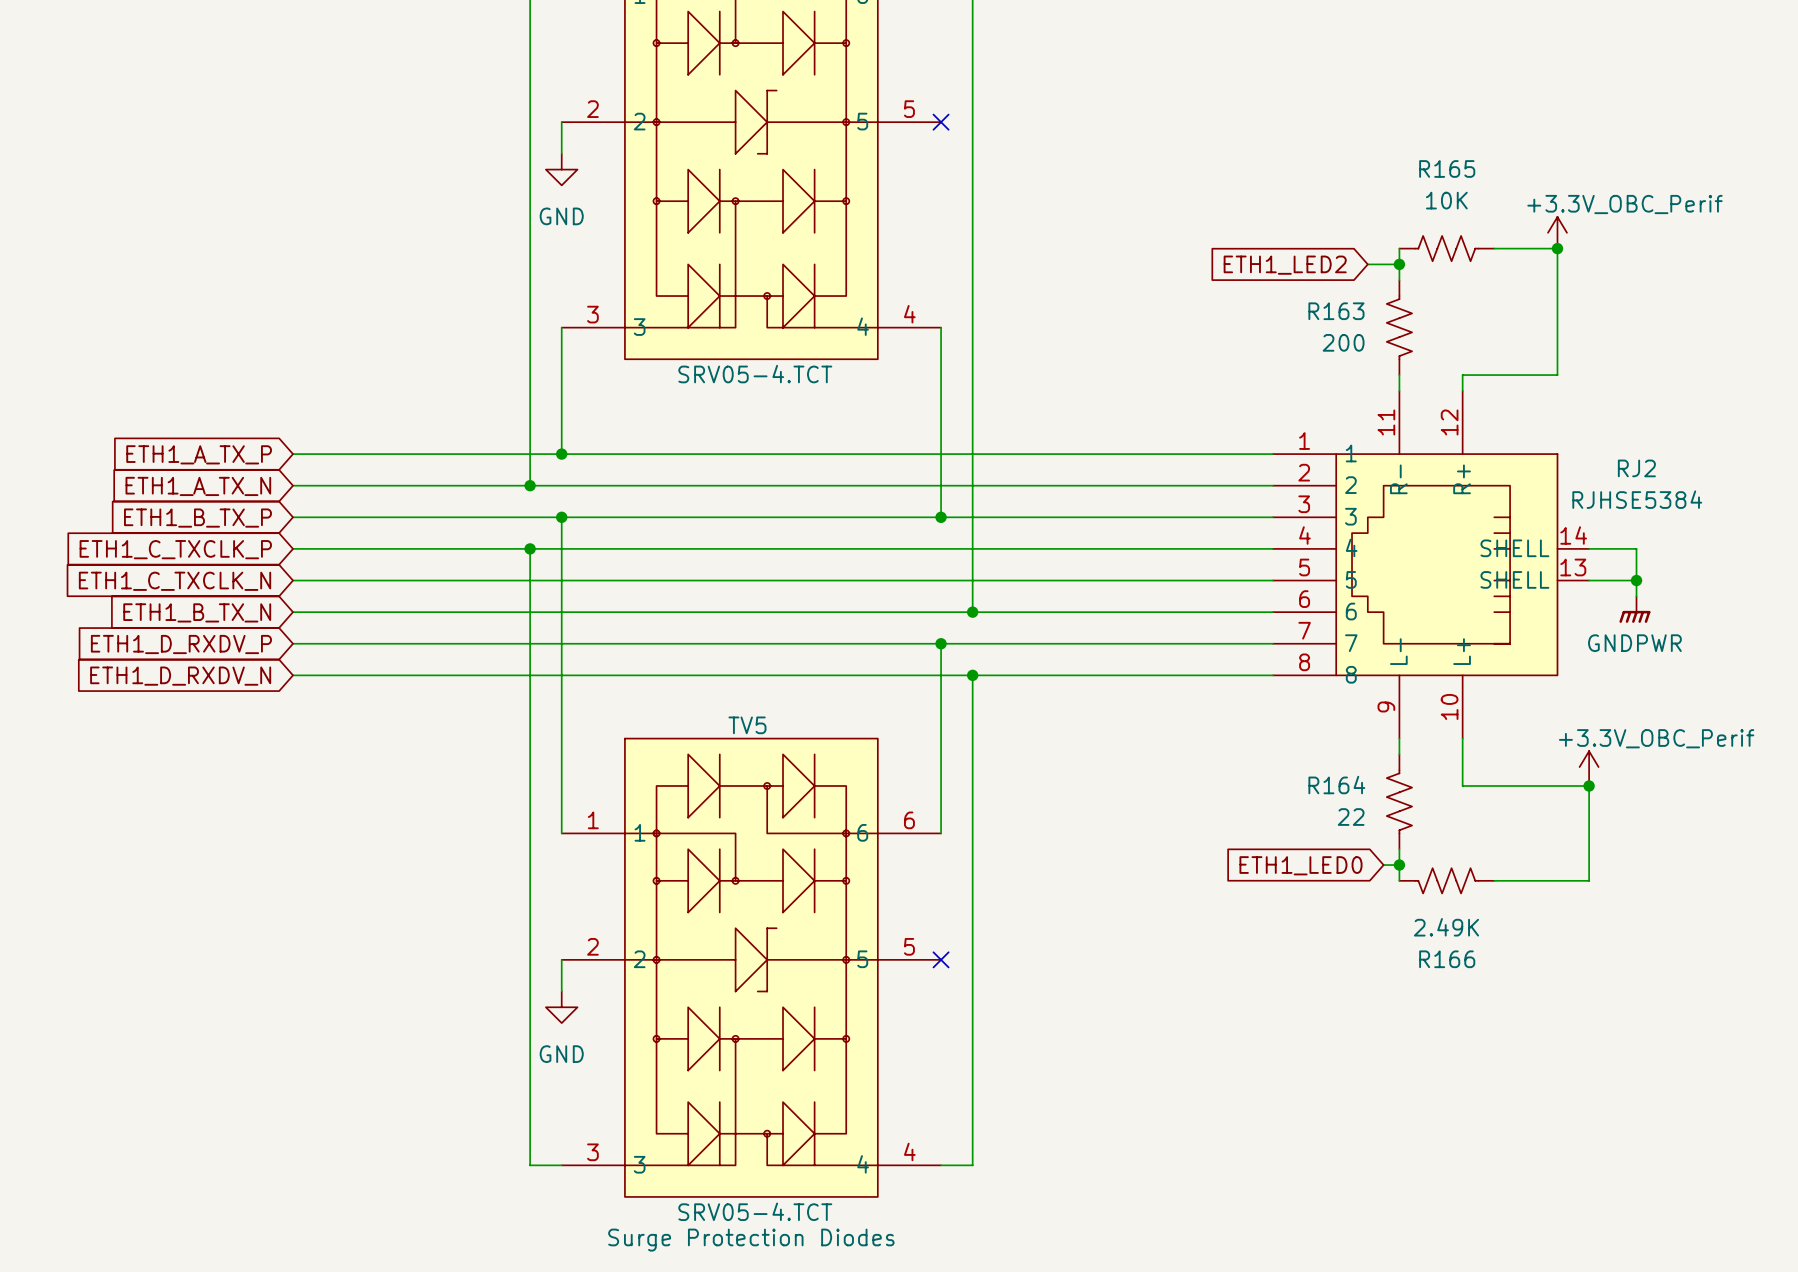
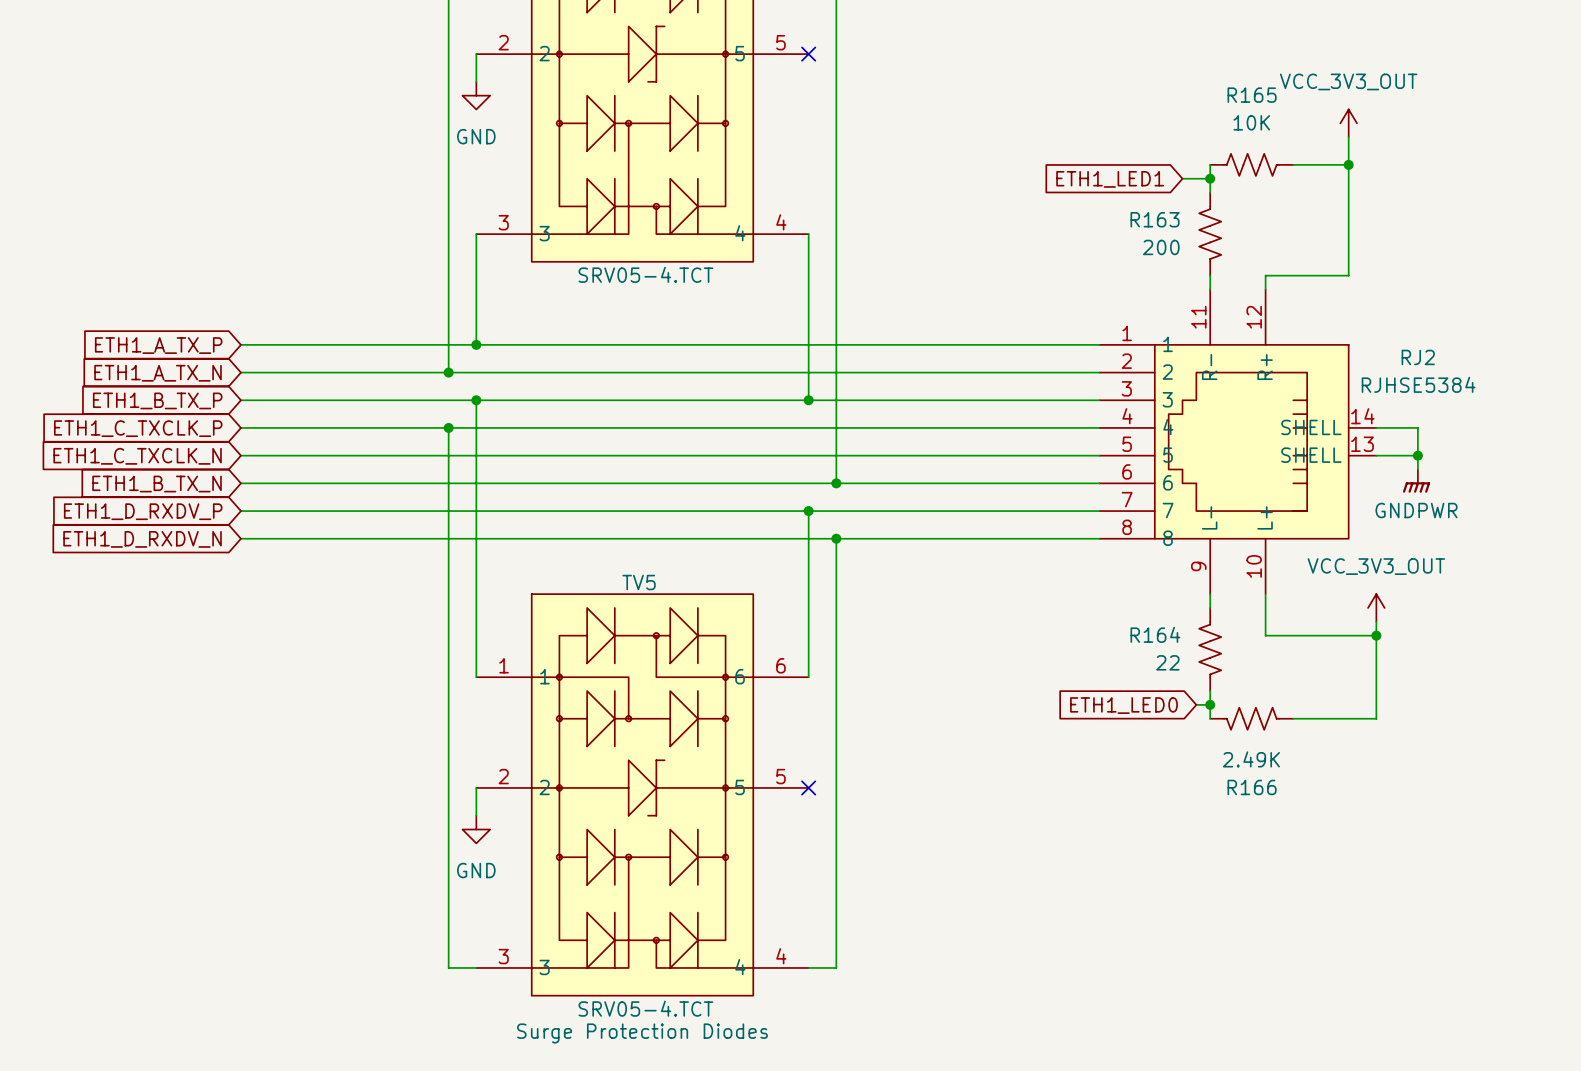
power symbol: none -> VCC_3V3_OUT (1348, 123)
power symbol: +3.3V_OBC_Perif (1557, 232) -> none
global label: ETH1_LED2 (1285, 265) -> ETH1_LED1 (1110, 179)
power symbol: none -> VCC_3V3_OUT (1376, 607)
power symbol: +3.3V_OBC_Perif (1589, 767) -> none

